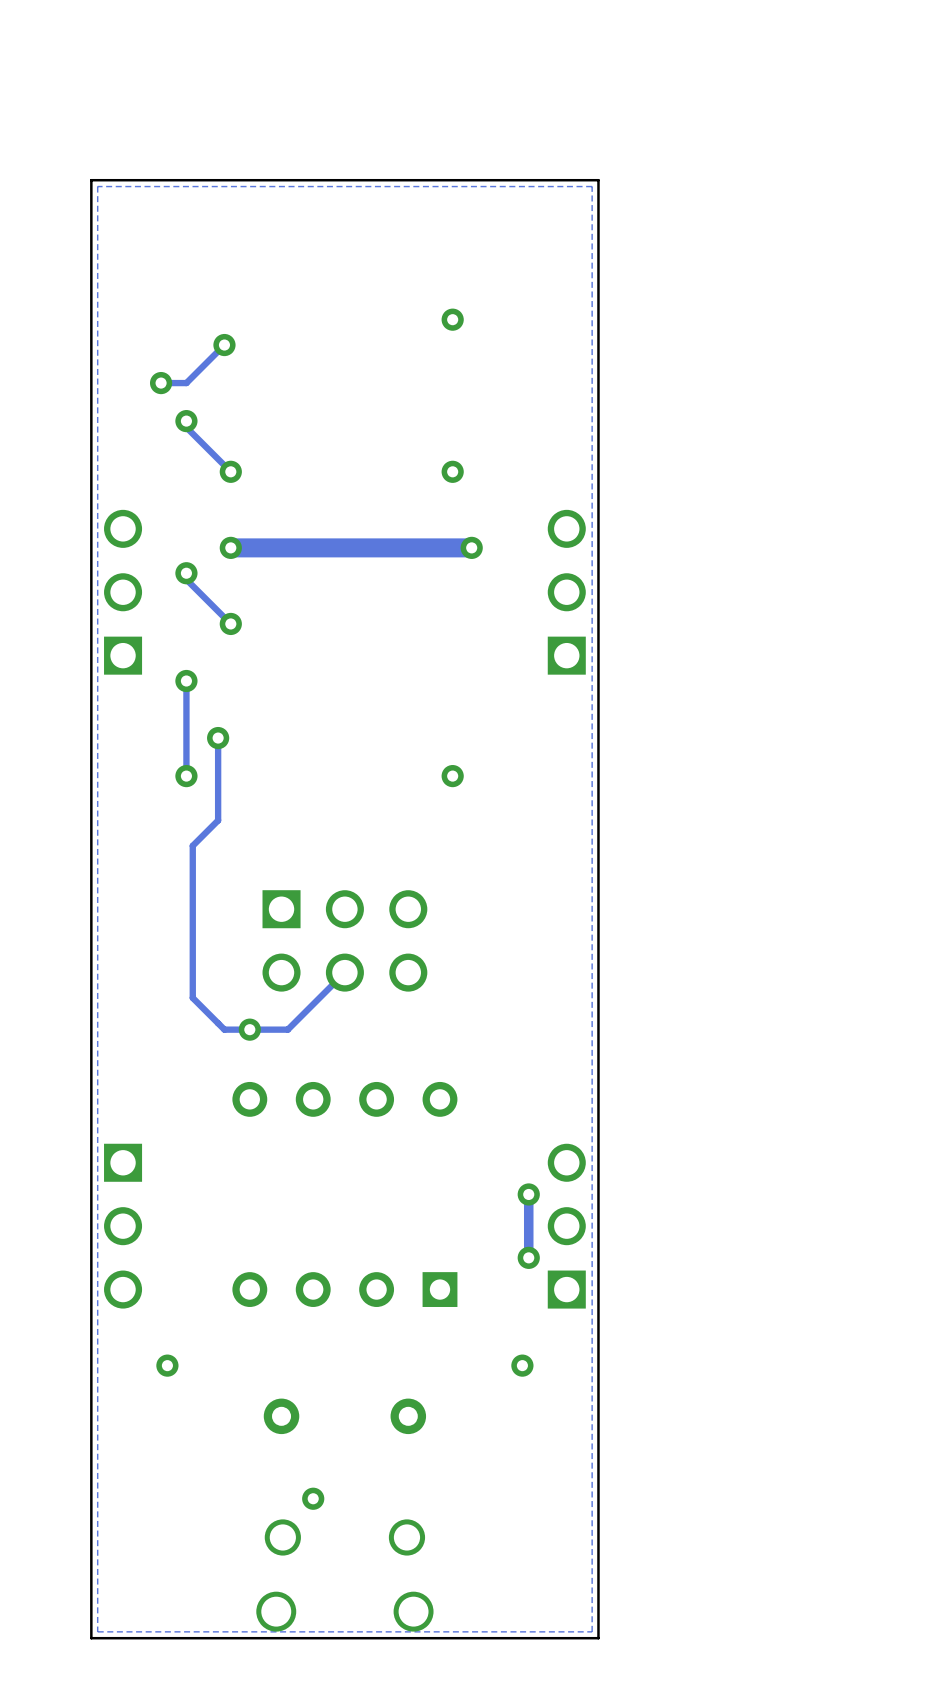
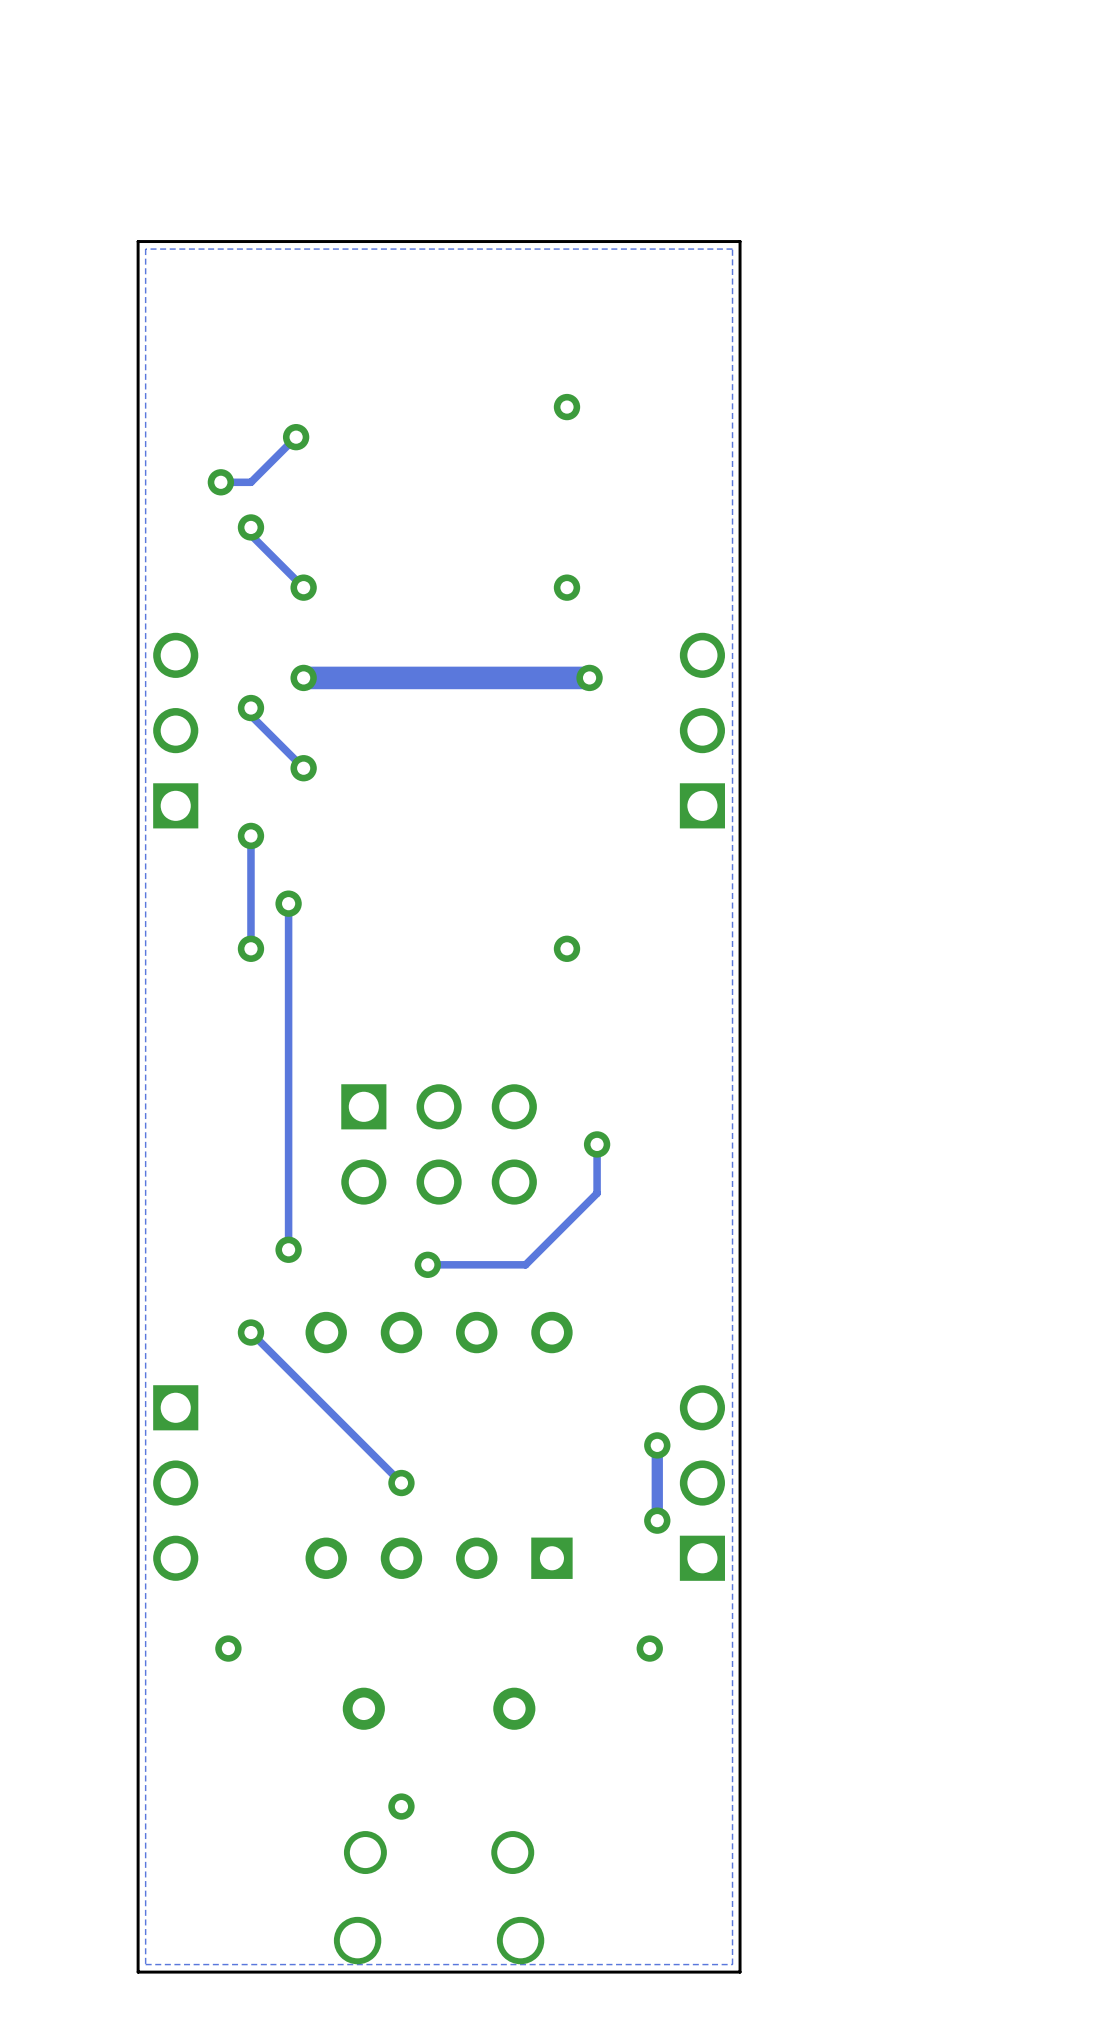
track: (218, 820) (192, 845) (192, 997) (224, 1029) (287, 1029) (344, 972) -> (288, 1001) (288, 1249)
track: none -> (597, 1144) (597, 1193) (525, 1264) (427, 1264)
via: none -> (597, 1144)
via position: (249, 1029) -> (288, 1249)
via: none -> (427, 1264)
track: none -> (250, 1332) (401, 1483)
via: none -> (250, 1332)
via: none -> (401, 1483)

